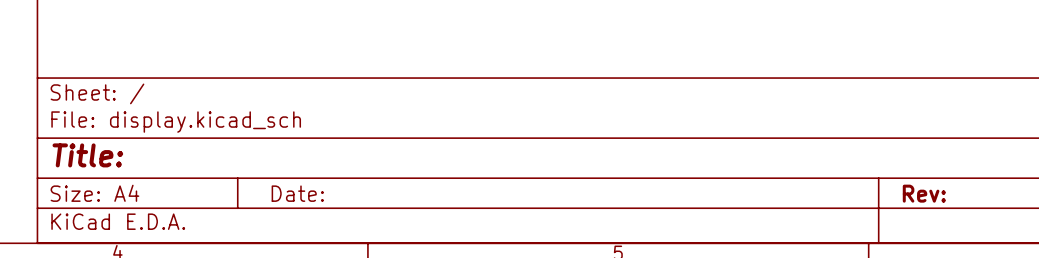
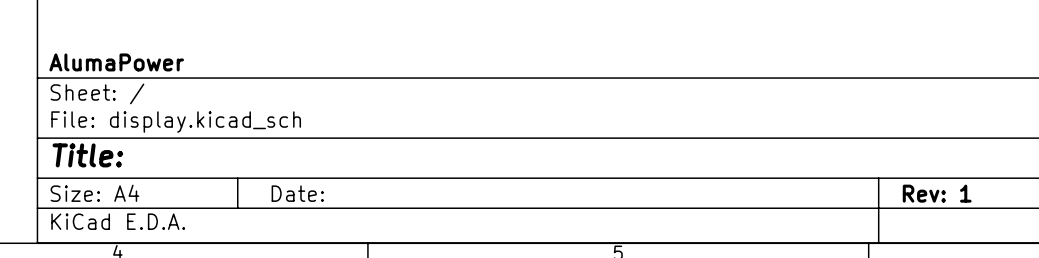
title block: none -> AlumaPower (116, 62)
title block: Rev: (924, 193) -> Rev: 1 (937, 193)

